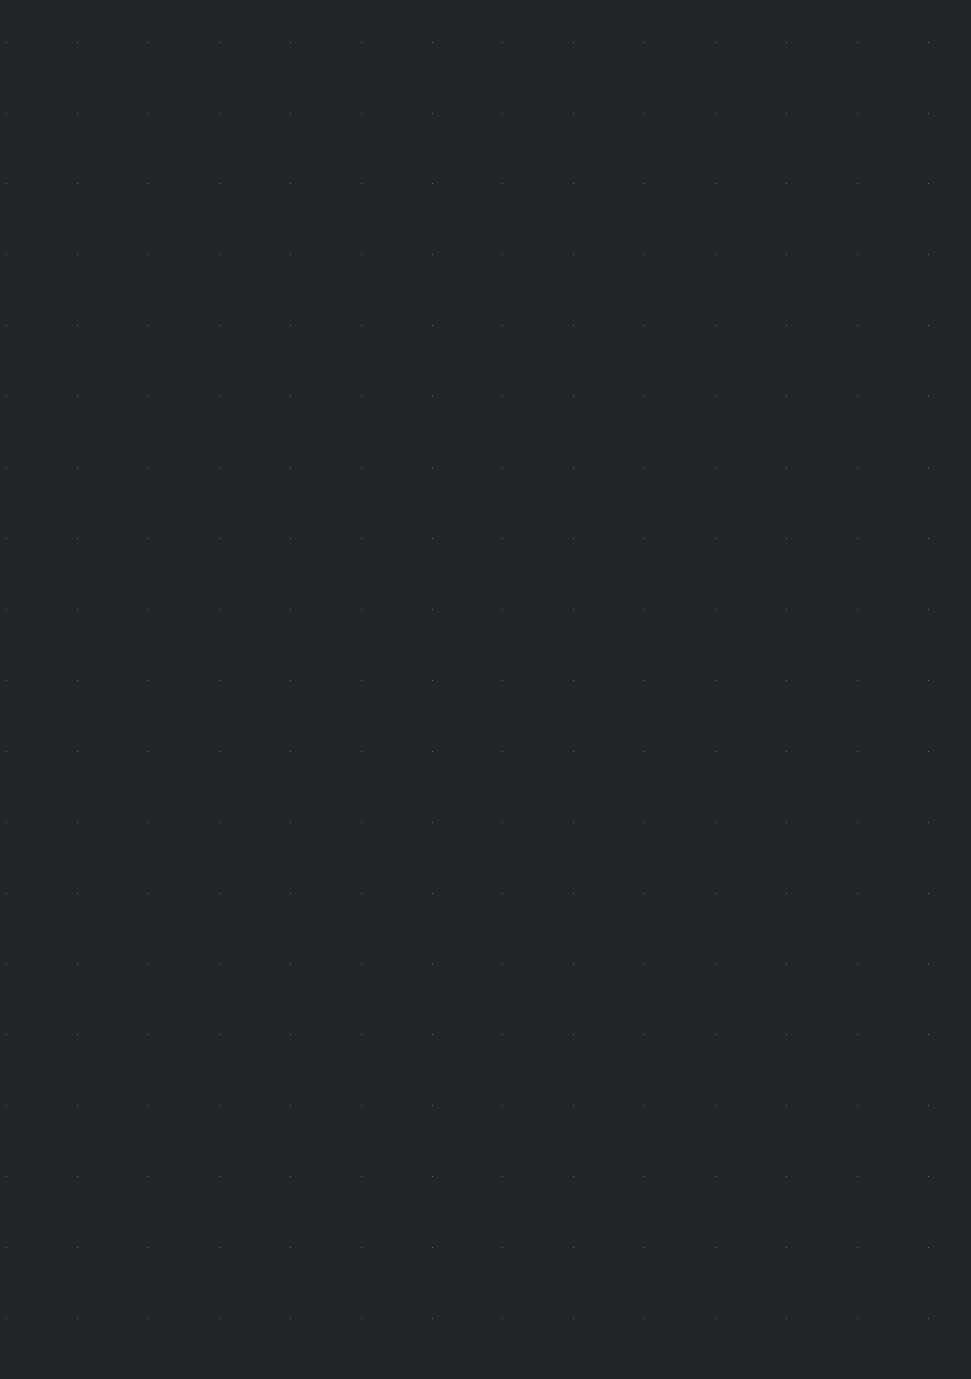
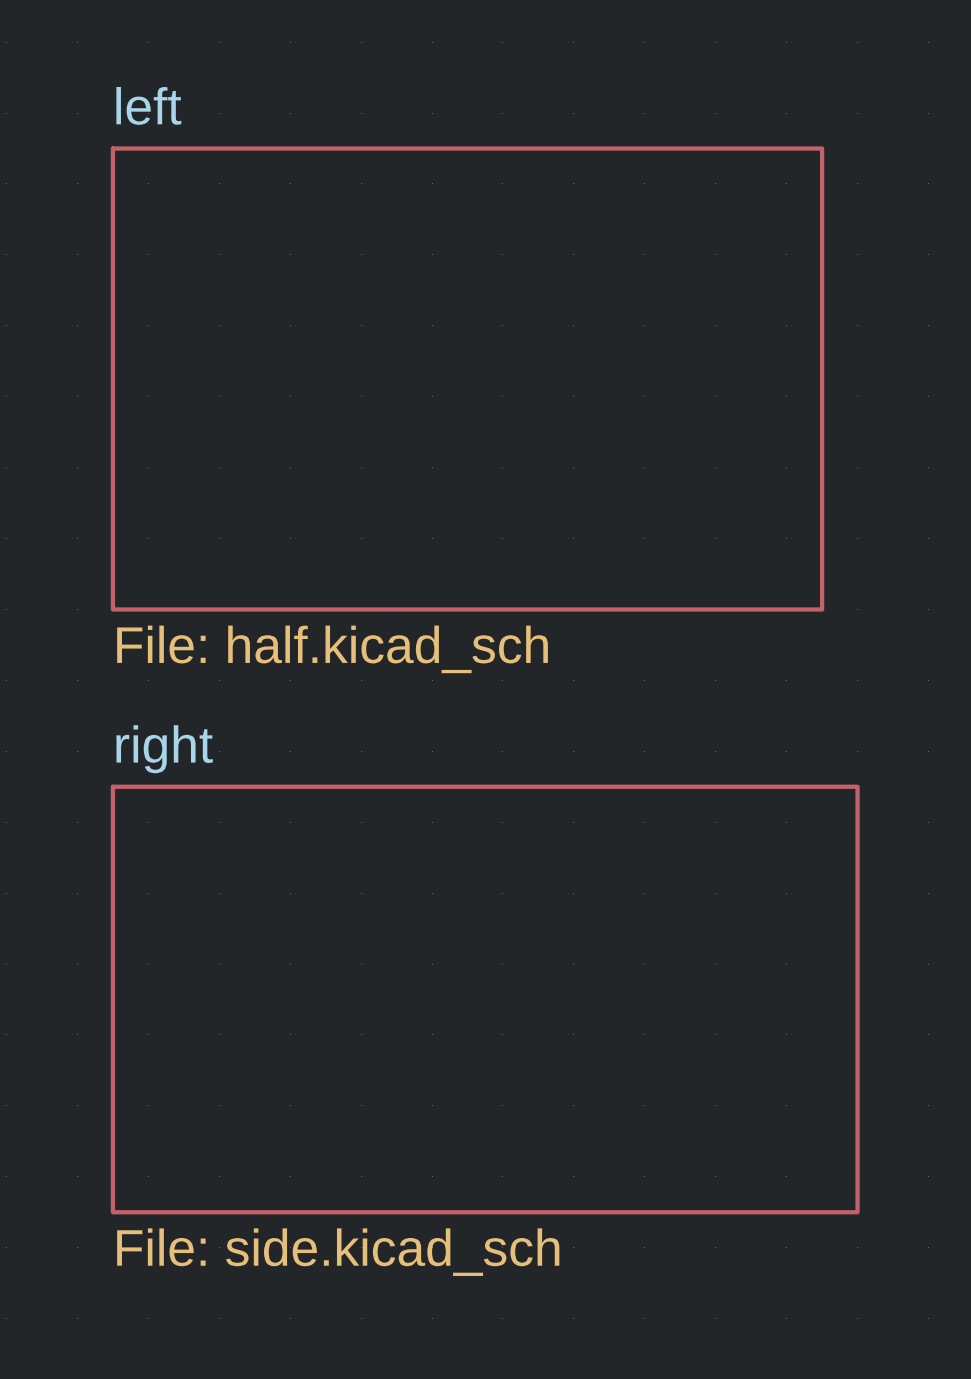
sheet left: none -> File: half.kicad_sch (467, 379)
sheet right: none -> File: side.kicad_sch (485, 999)

